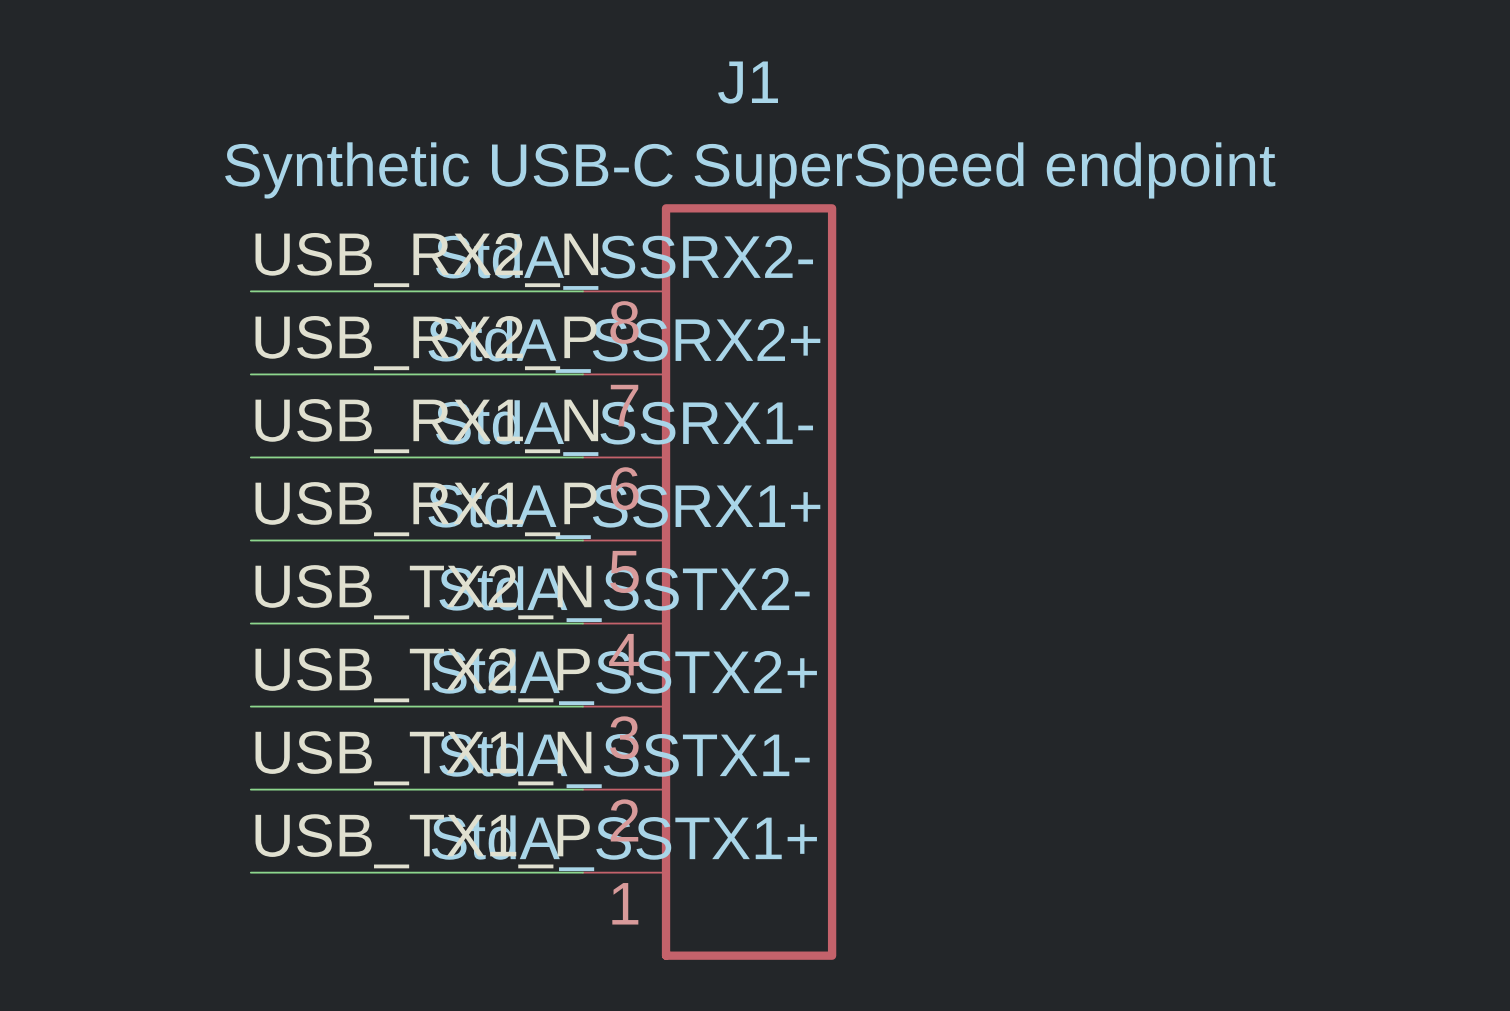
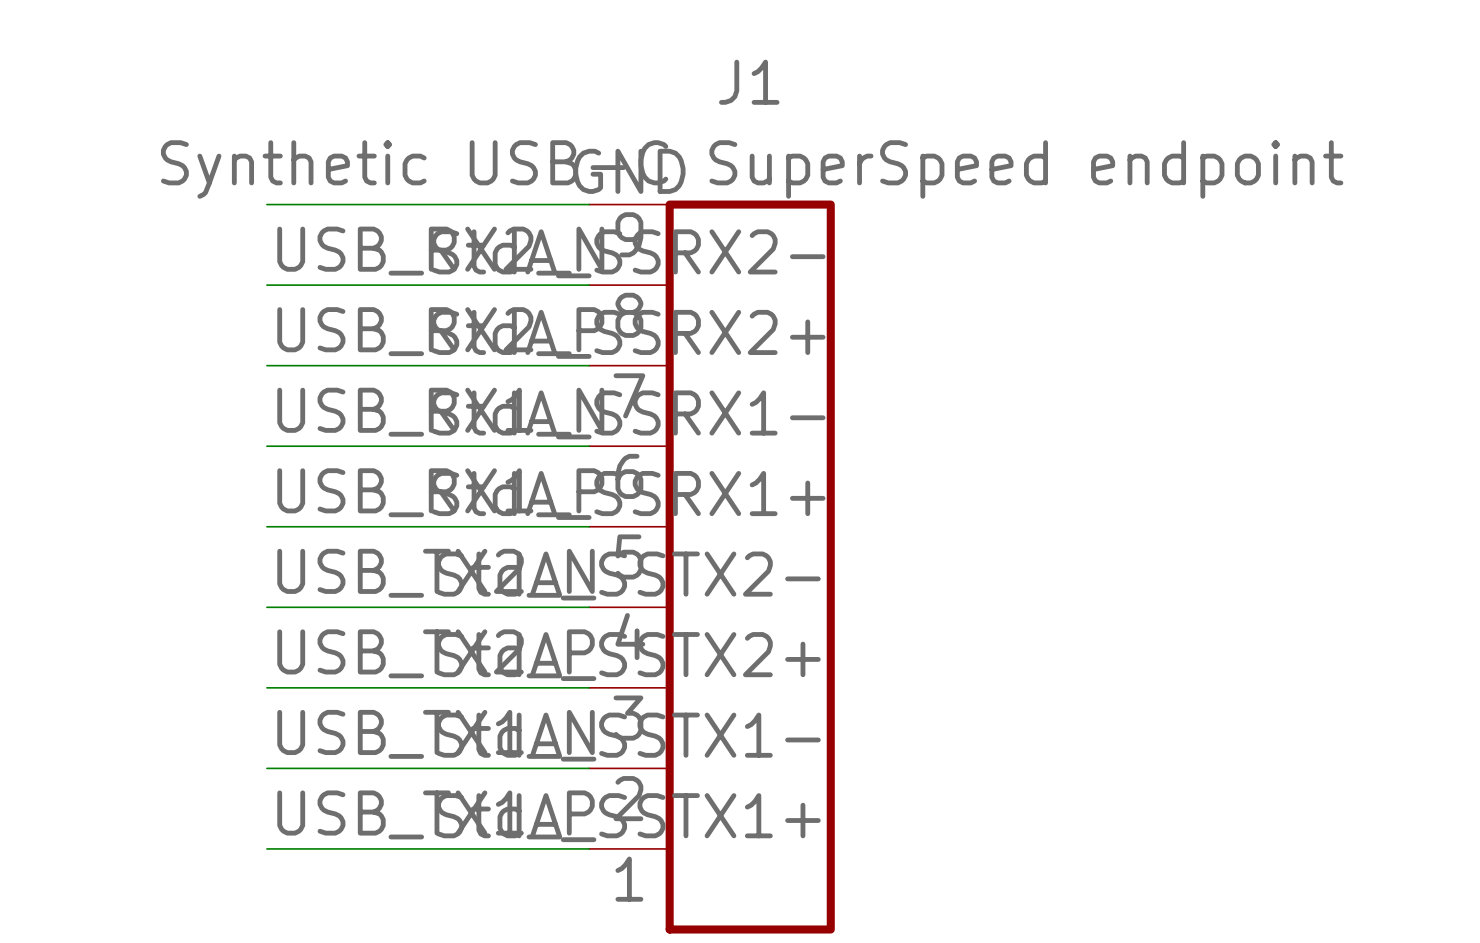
J1 symbol: [582, 204, 837, 960] -> [589, 200, 835, 934]
wire: none -> (266, 204) (589, 204)

